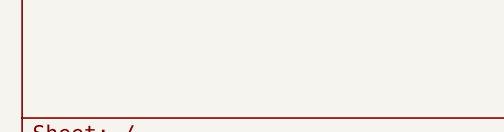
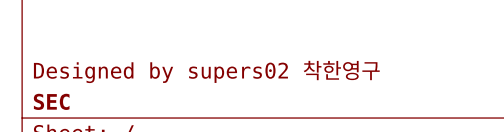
title block: none -> Designed by supers02 착한영구 (206, 71)
title block: none -> SEC (51, 101)

